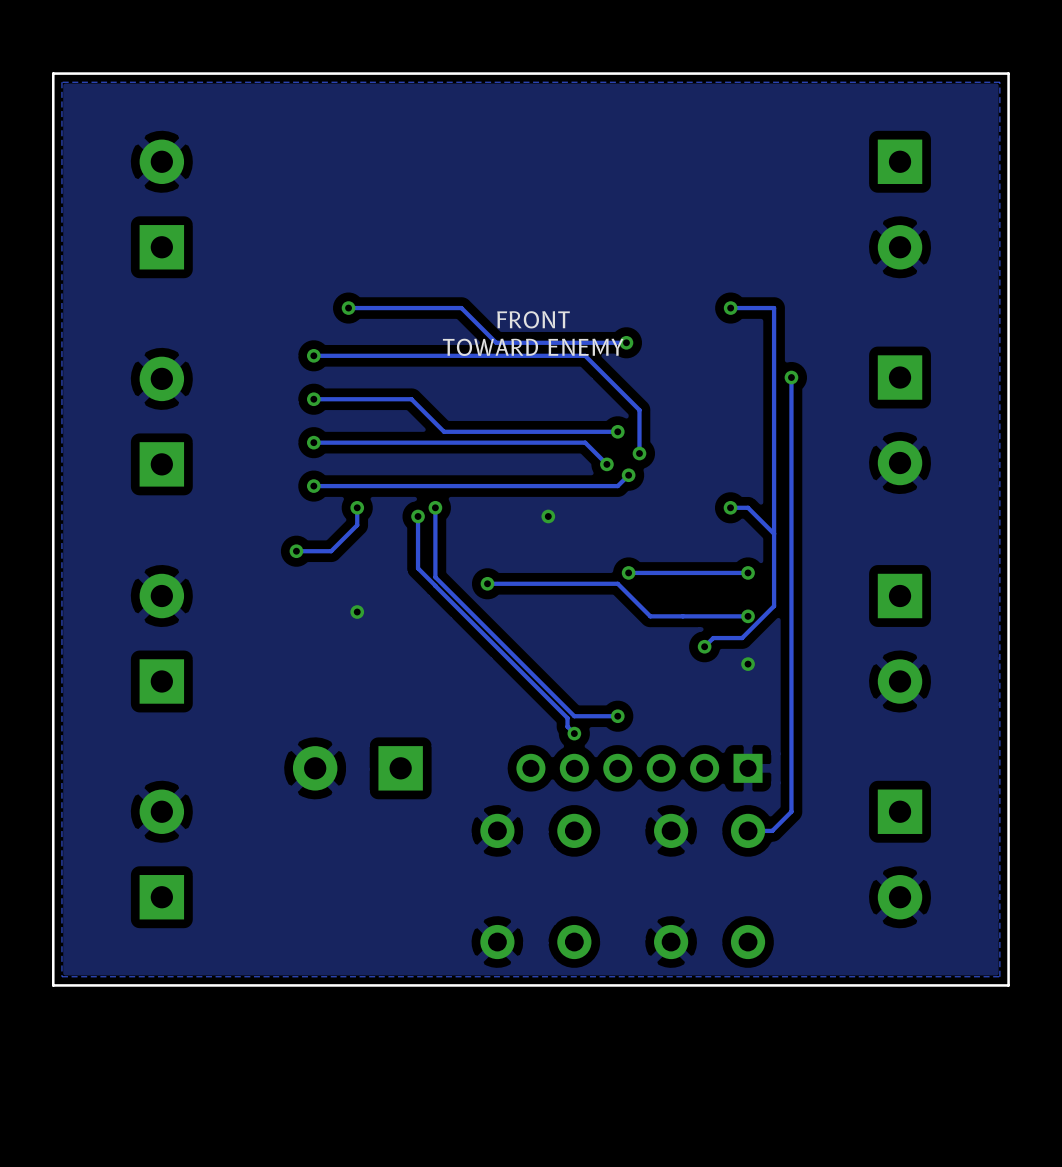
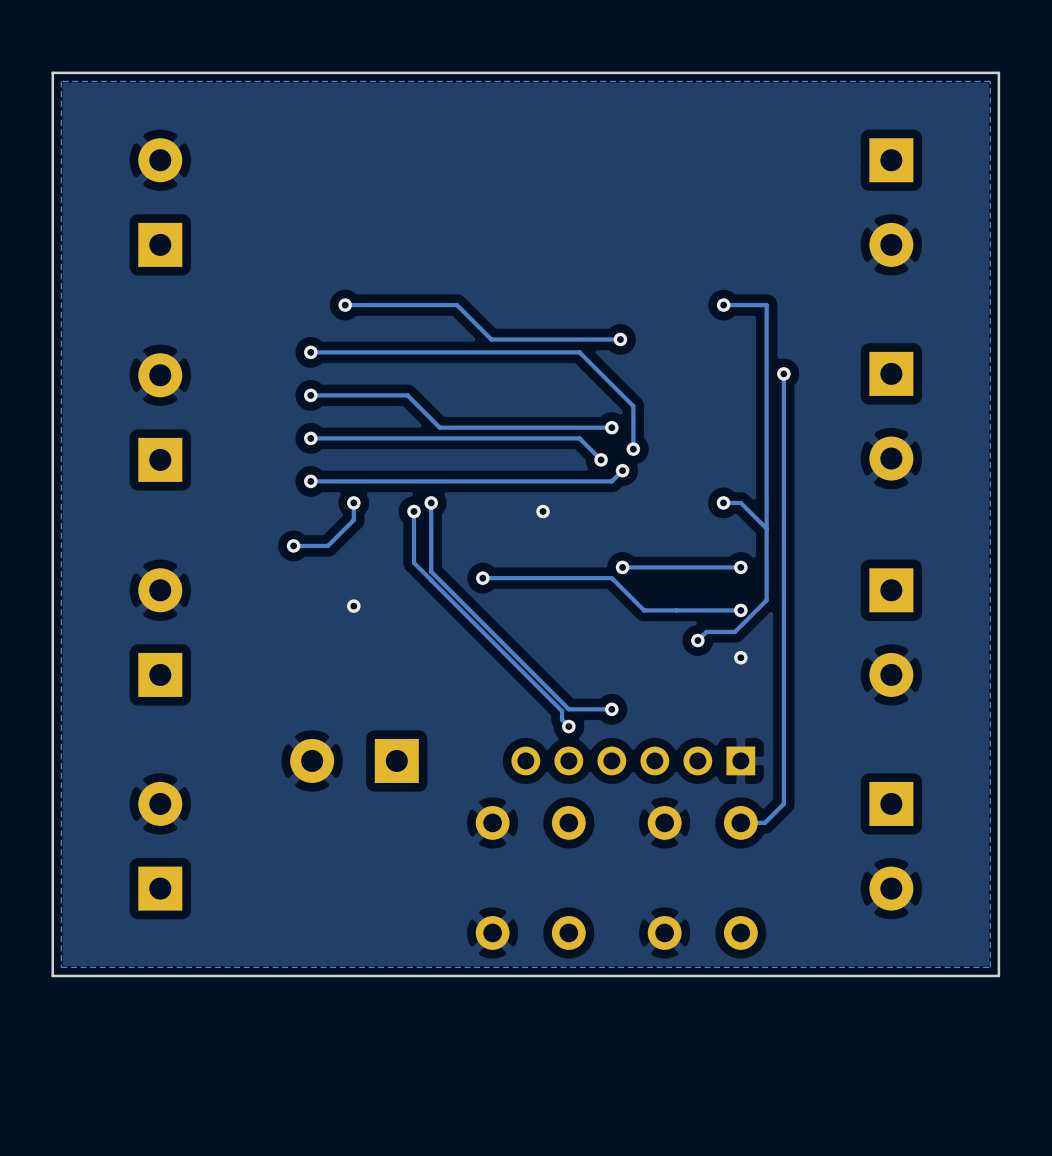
text: FRONT (533, 319) -> none
text: TOWARD ENEMY (533, 347) -> none

